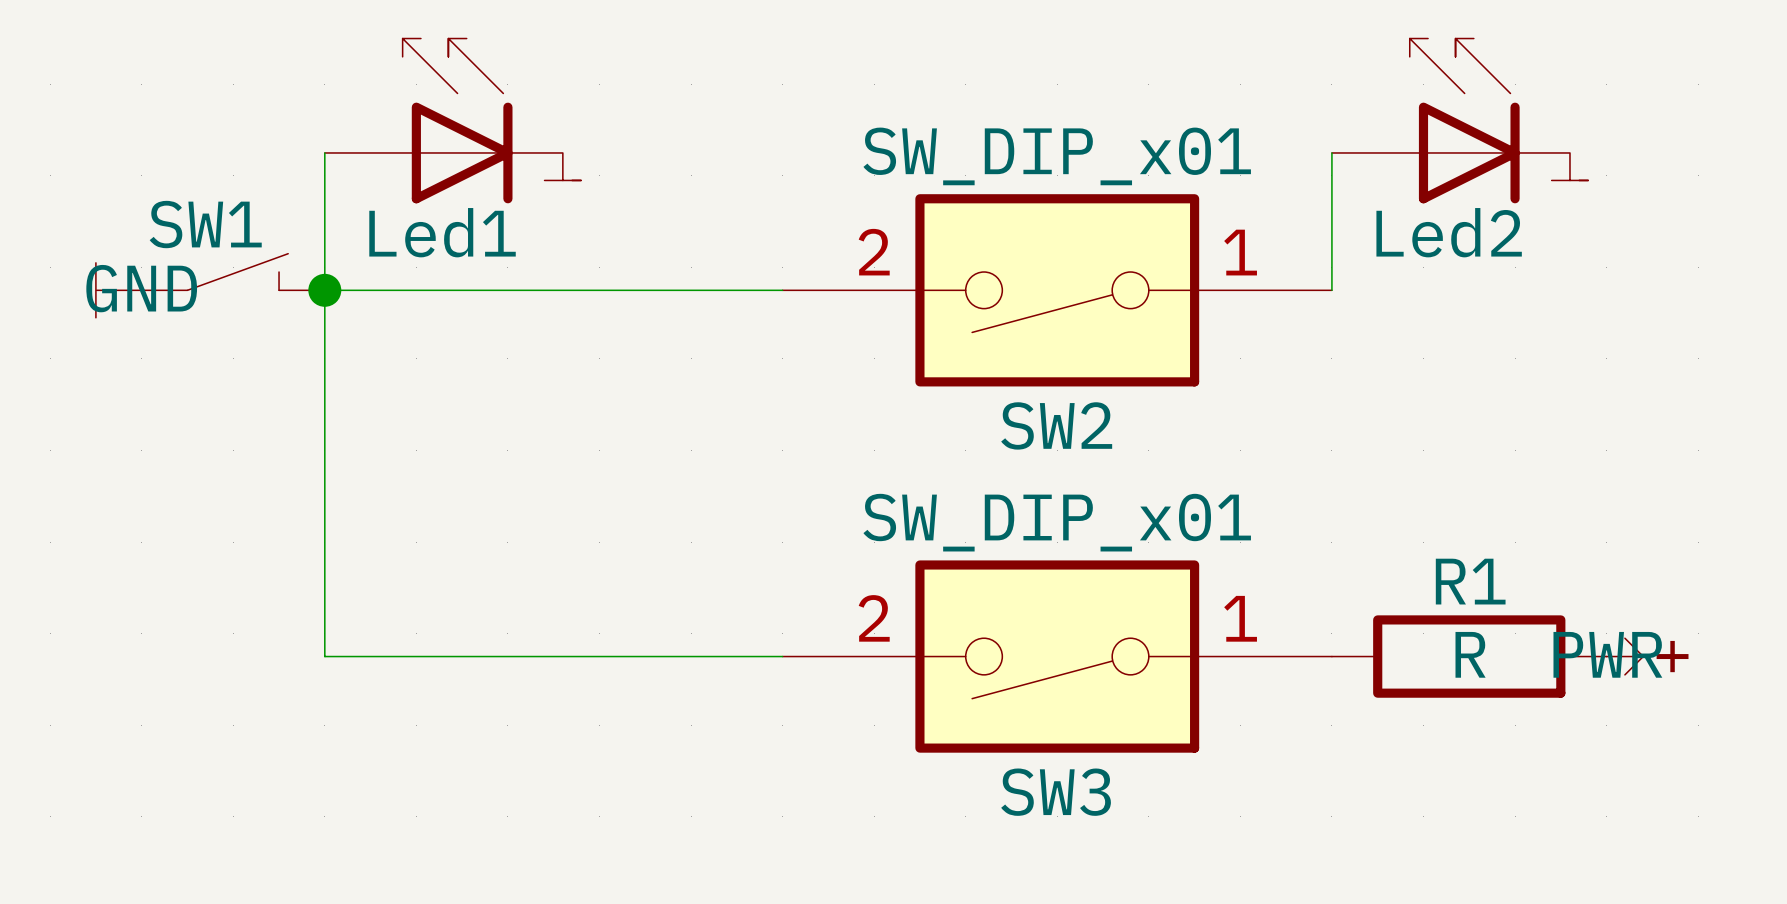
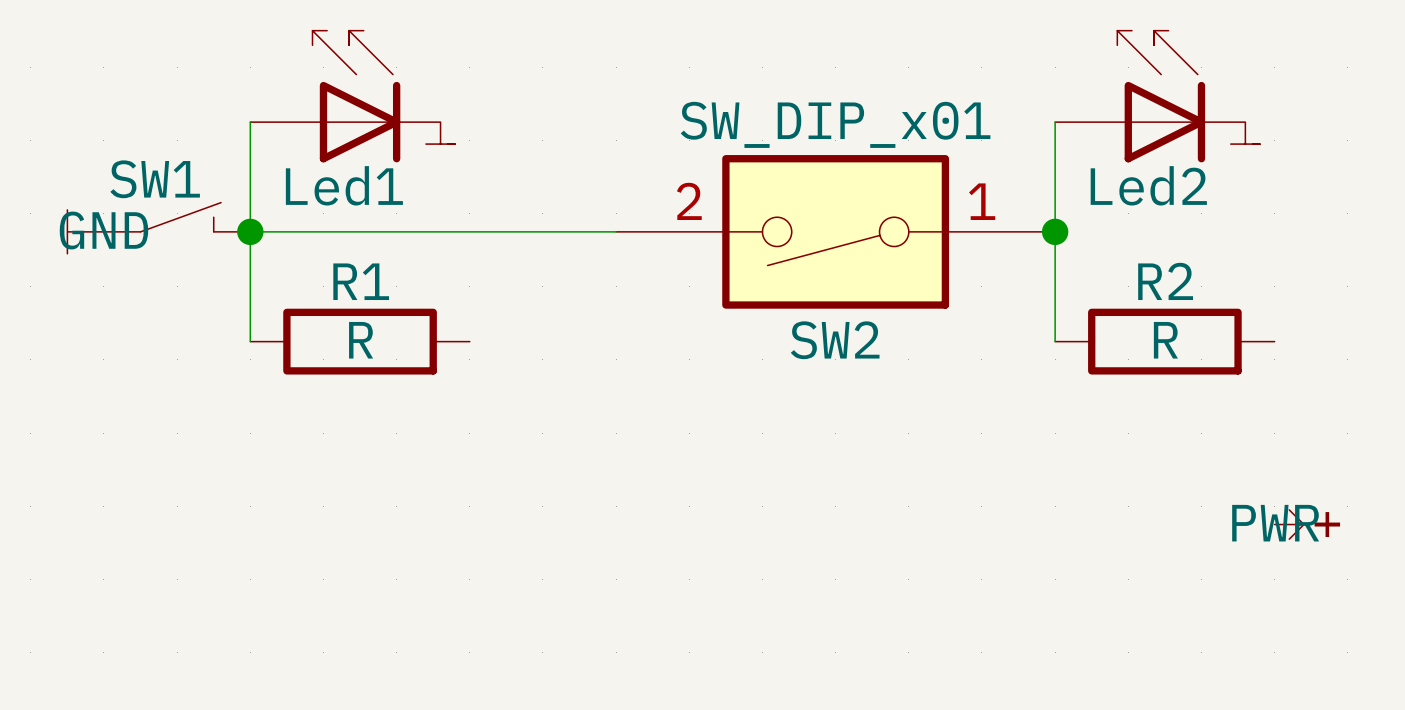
wire: none -> (1055, 231) (1055, 341)
junction: none -> (1055, 231)
wire: (324, 427) (324, 656) (782, 656) -> none
R2: none -> R (1164, 341)
SW3: SW_DIP_x01 (1057, 656) -> none
R1 position: (1469, 656) -> (360, 341)

